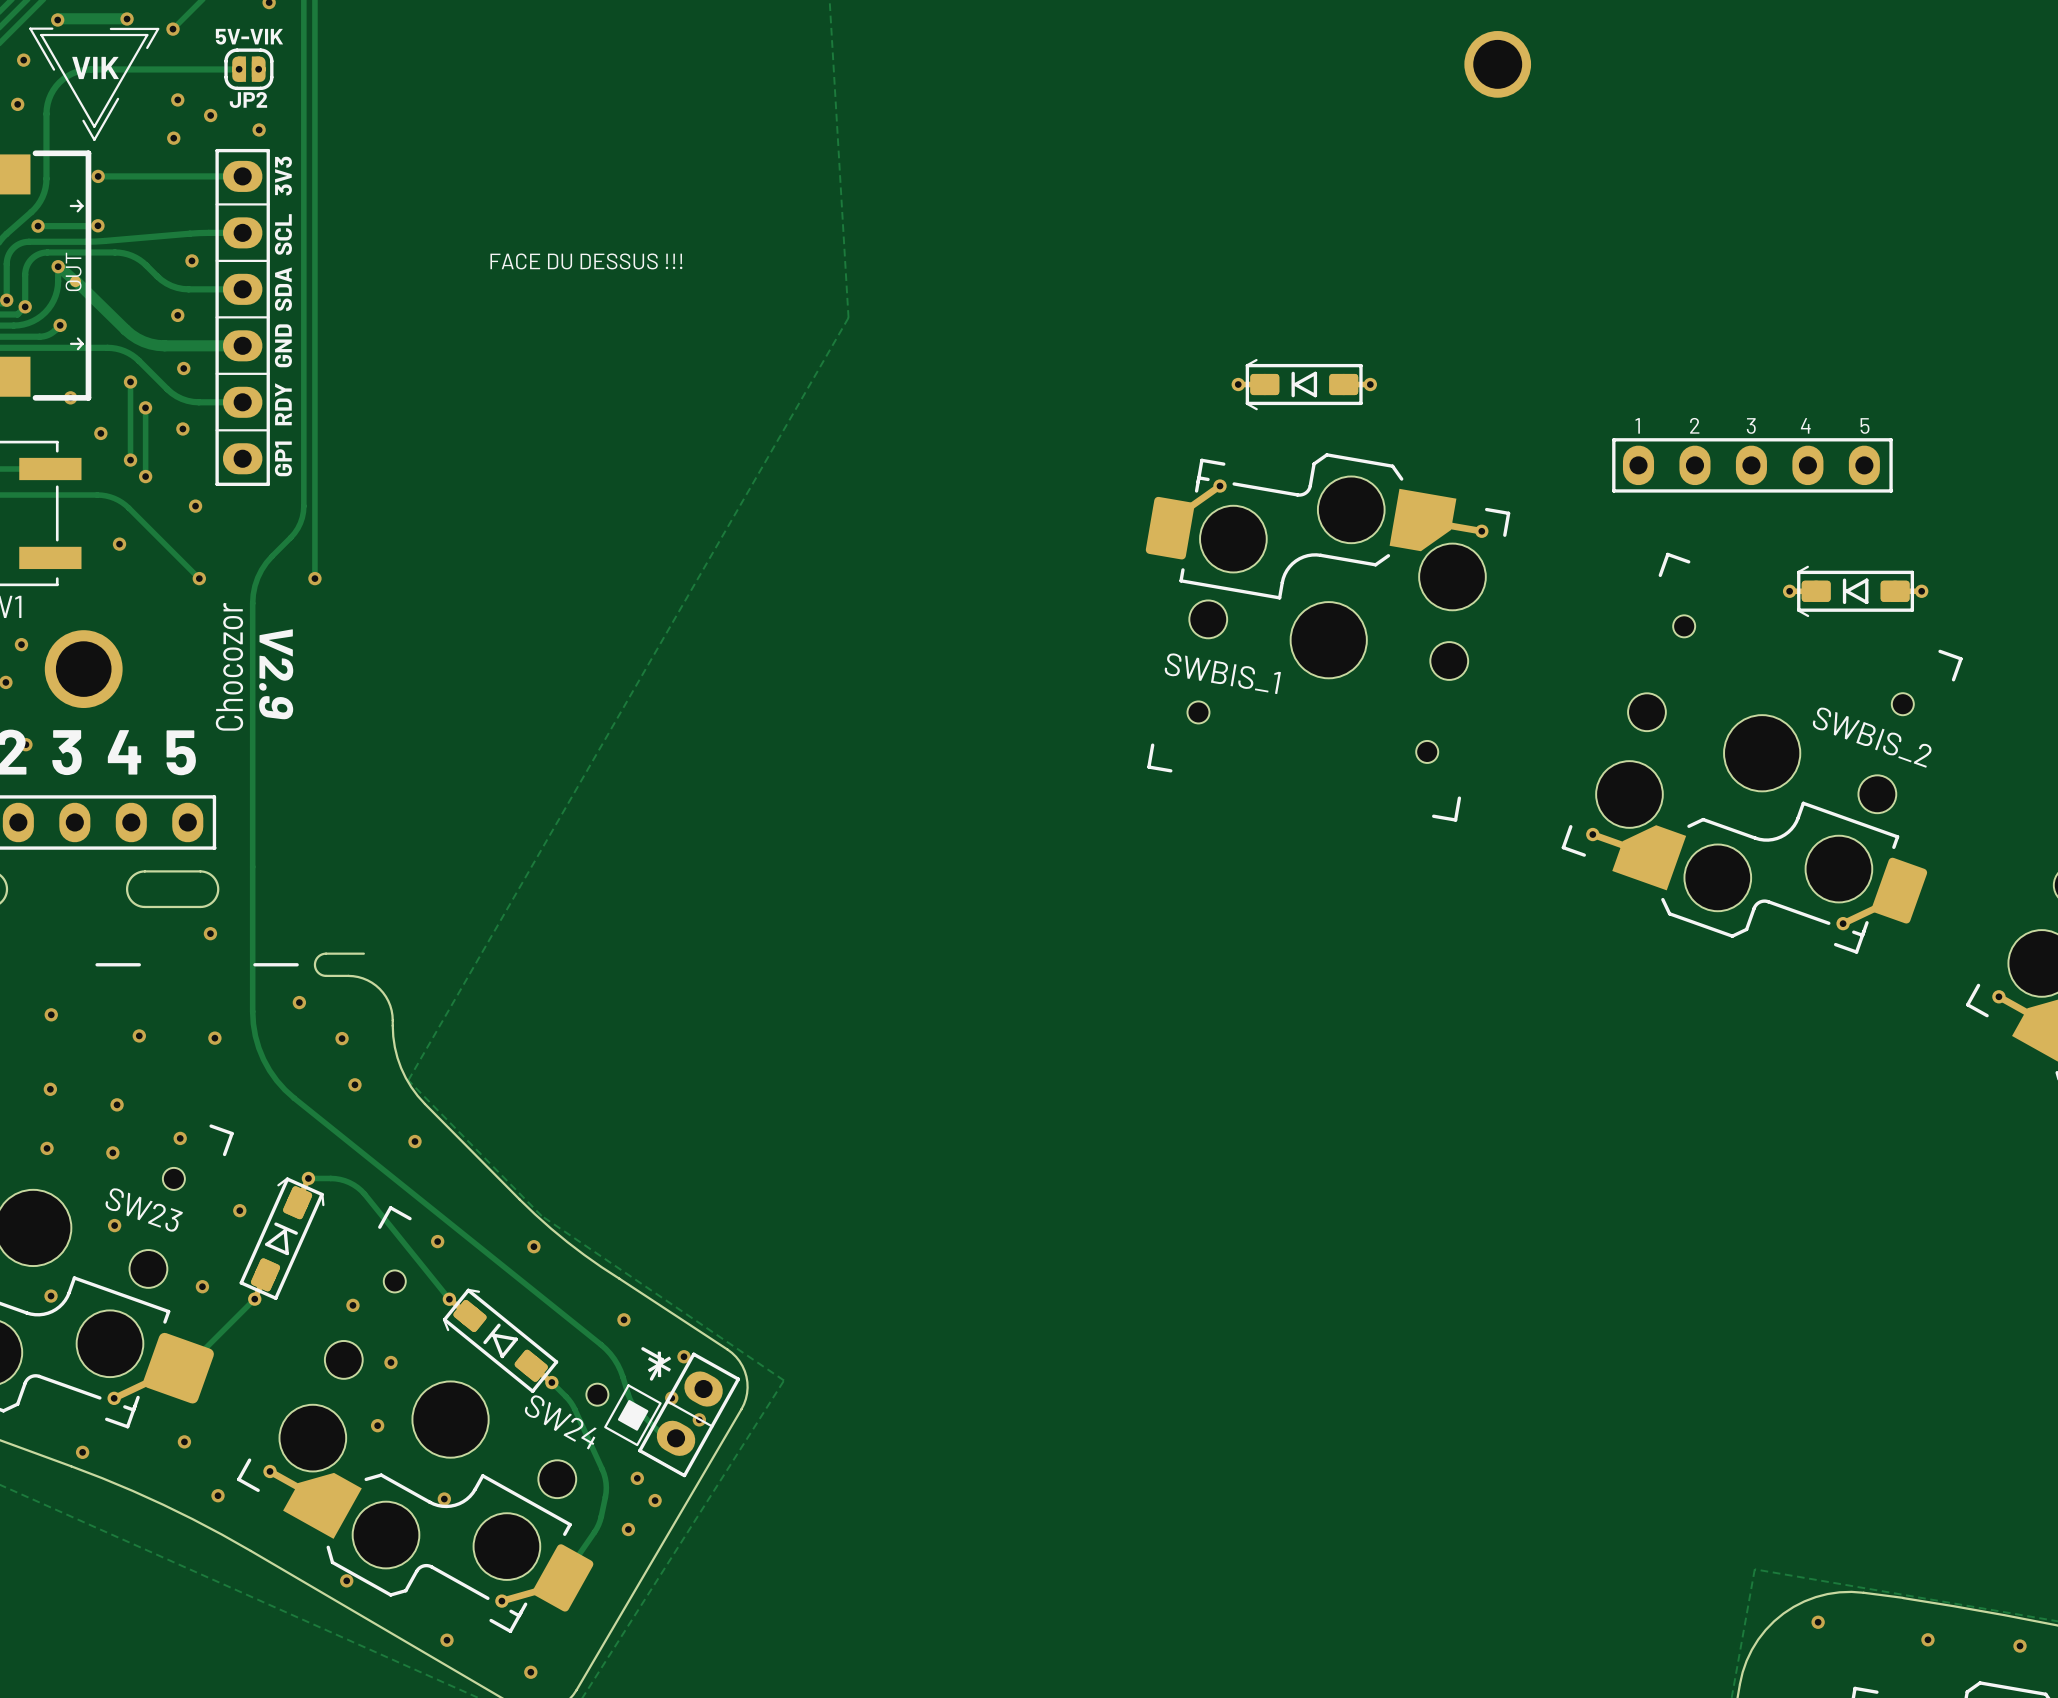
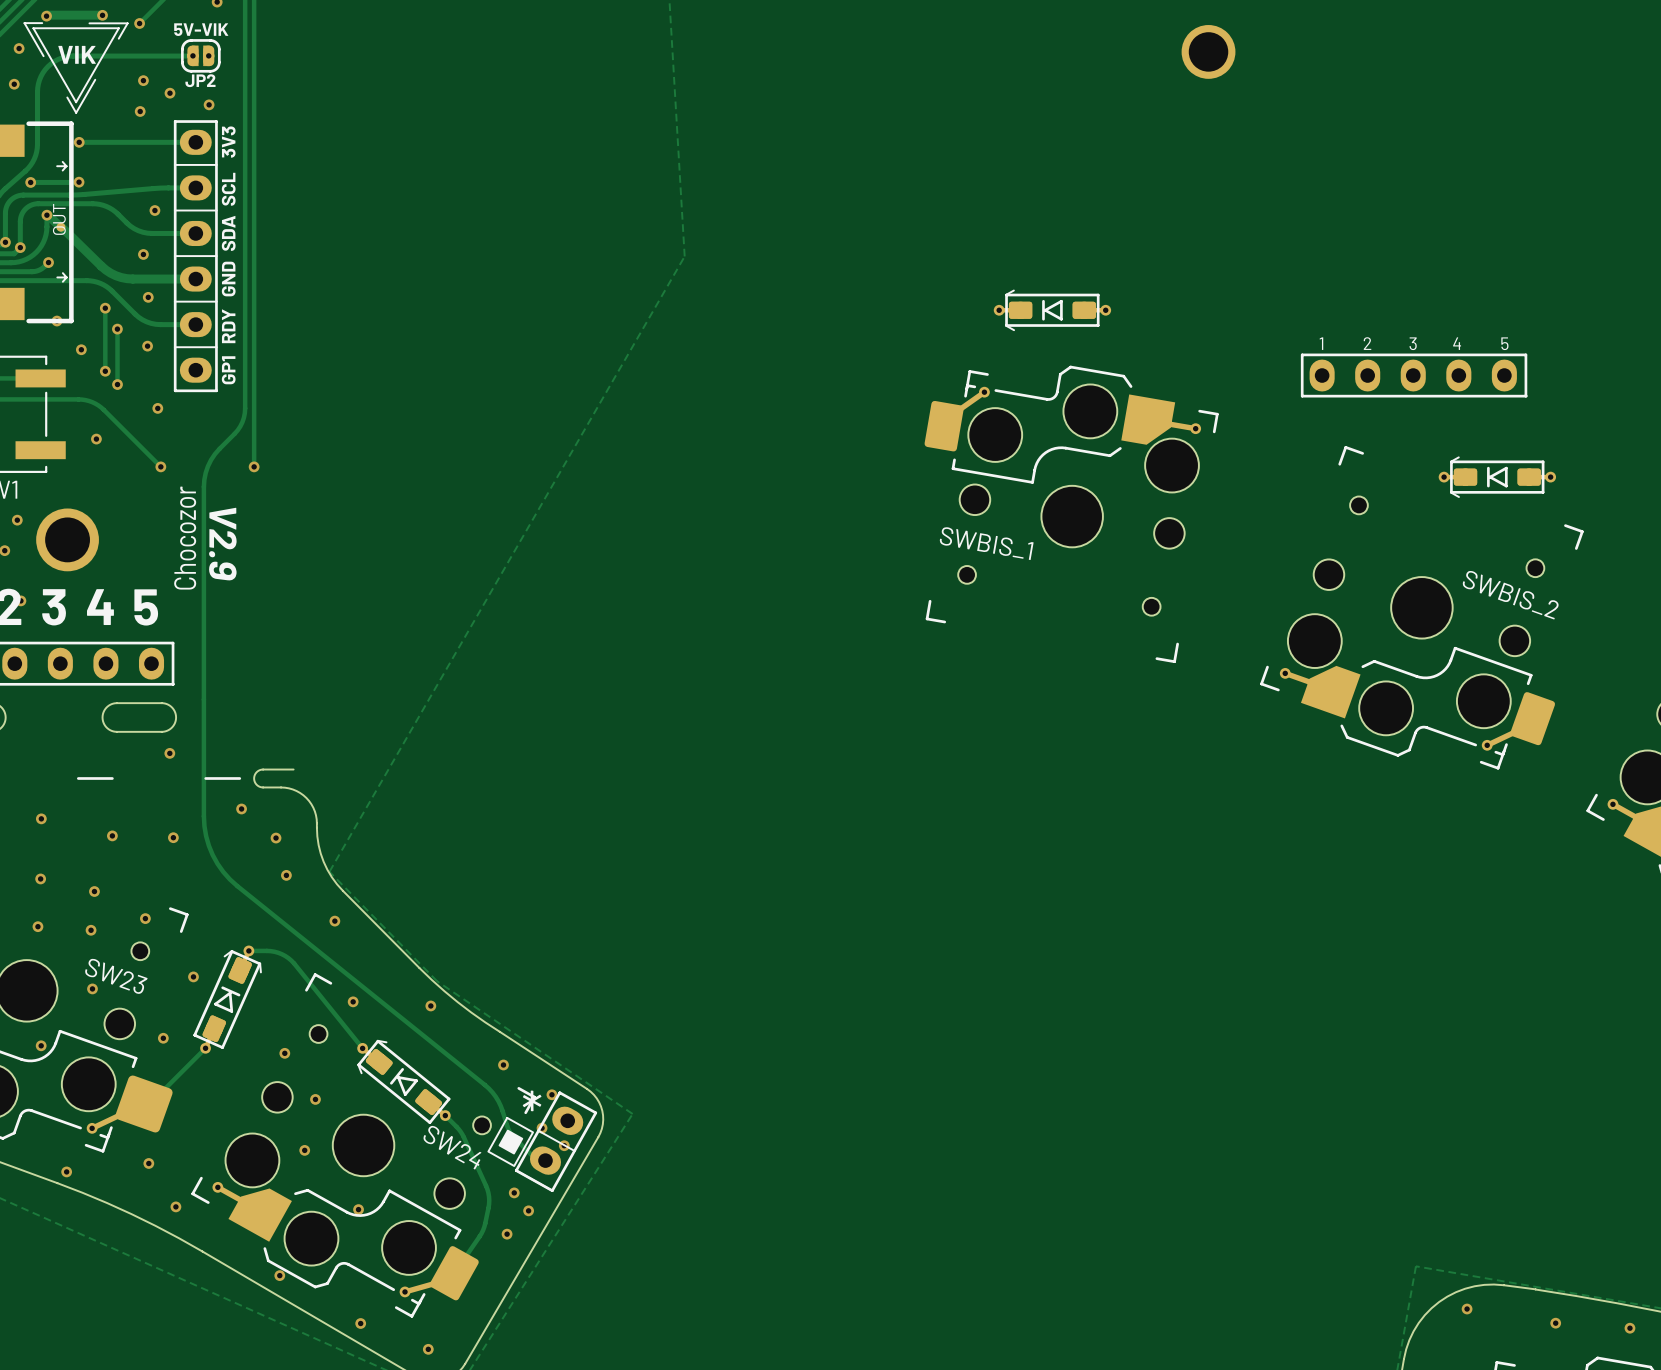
text: FACE DU DESSUS !!! (586, 261) -> none

